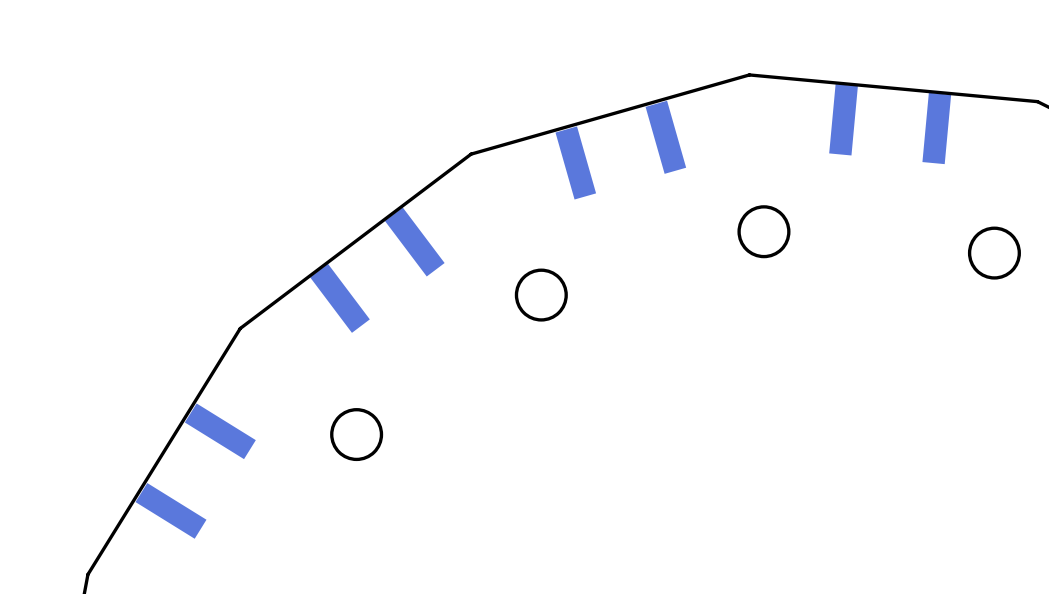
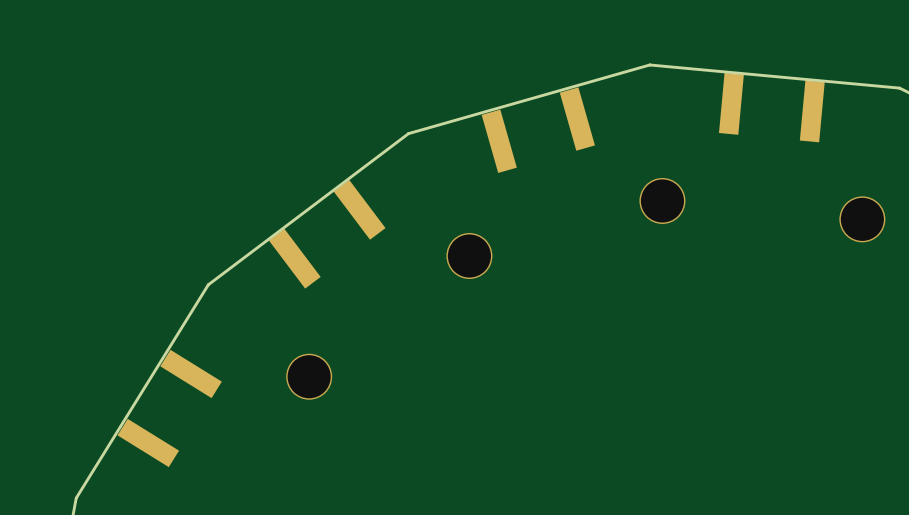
round board edge: [737, 205, 791, 259] -> none
round board edge: [967, 226, 1021, 280] -> none
via: none -> (662, 200)
via: none -> (862, 219)
round board edge: [514, 268, 568, 322] -> none
via: none -> (469, 256)
round board edge: [330, 408, 384, 462] -> none
via: none -> (309, 376)

